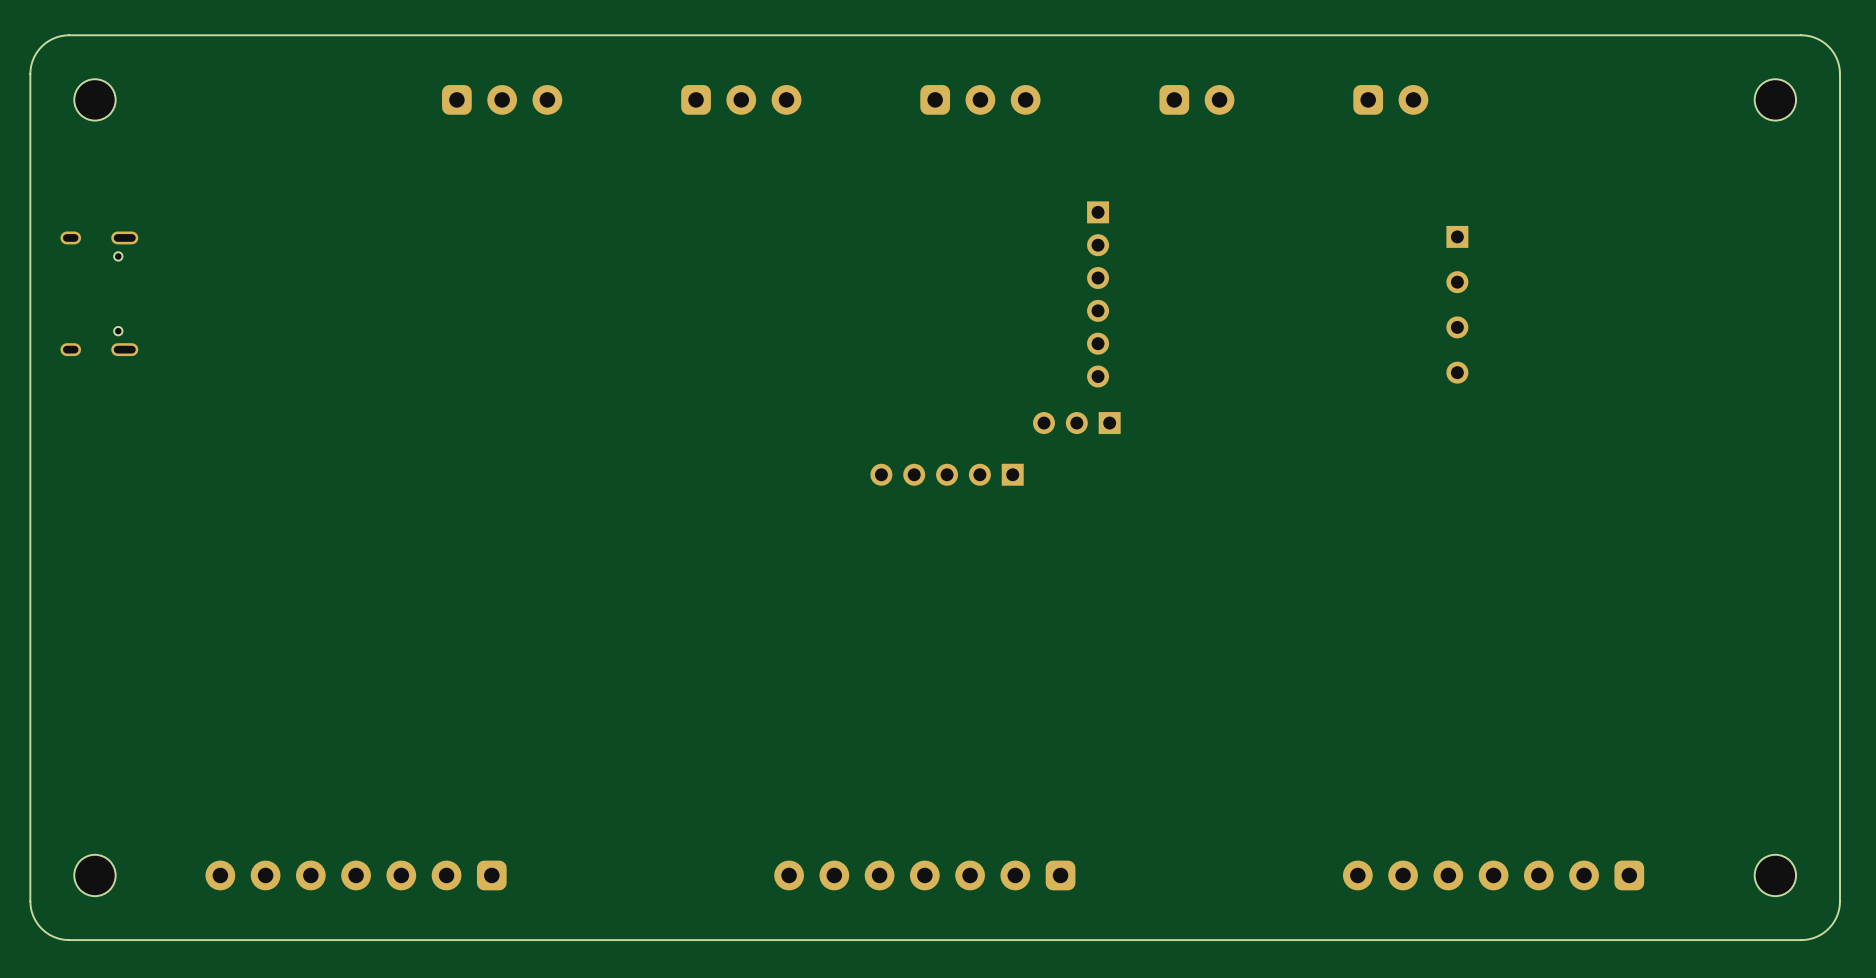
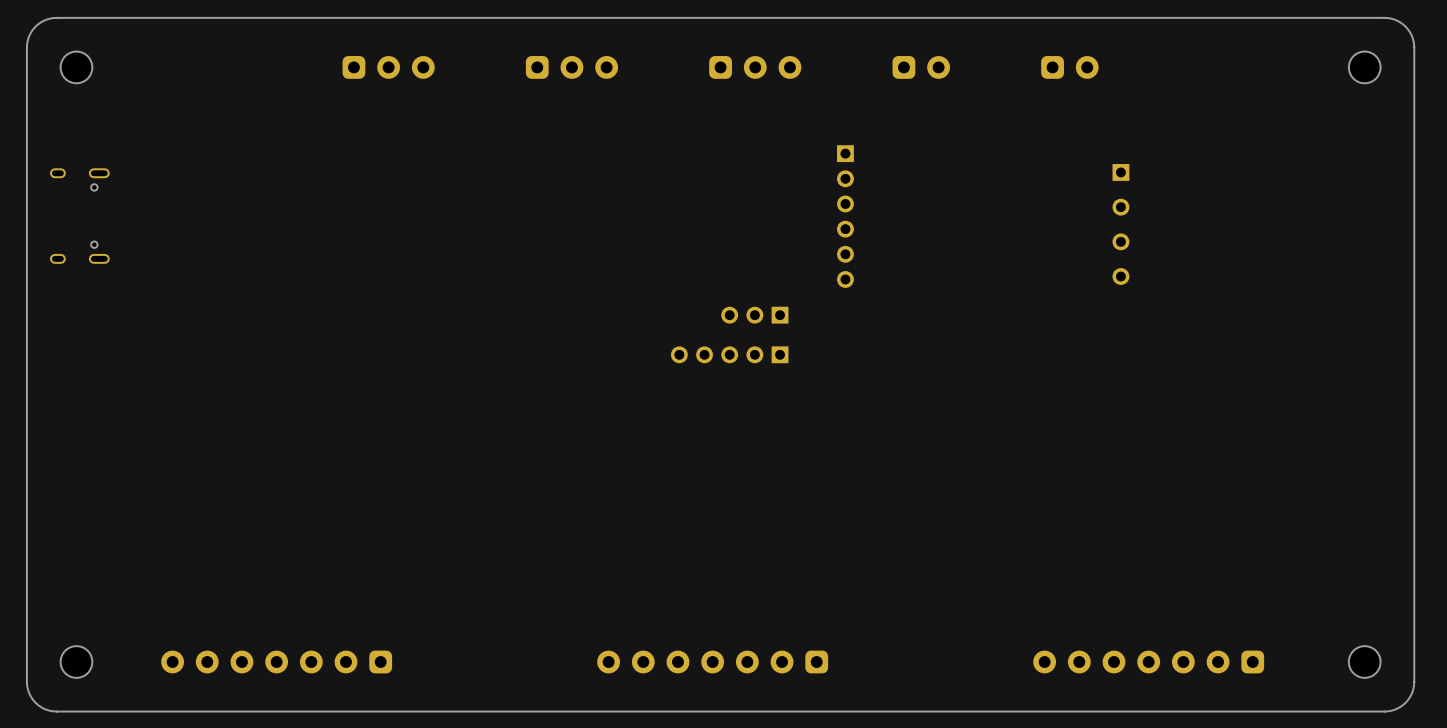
part position: (1076, 423) -> (754, 315)

